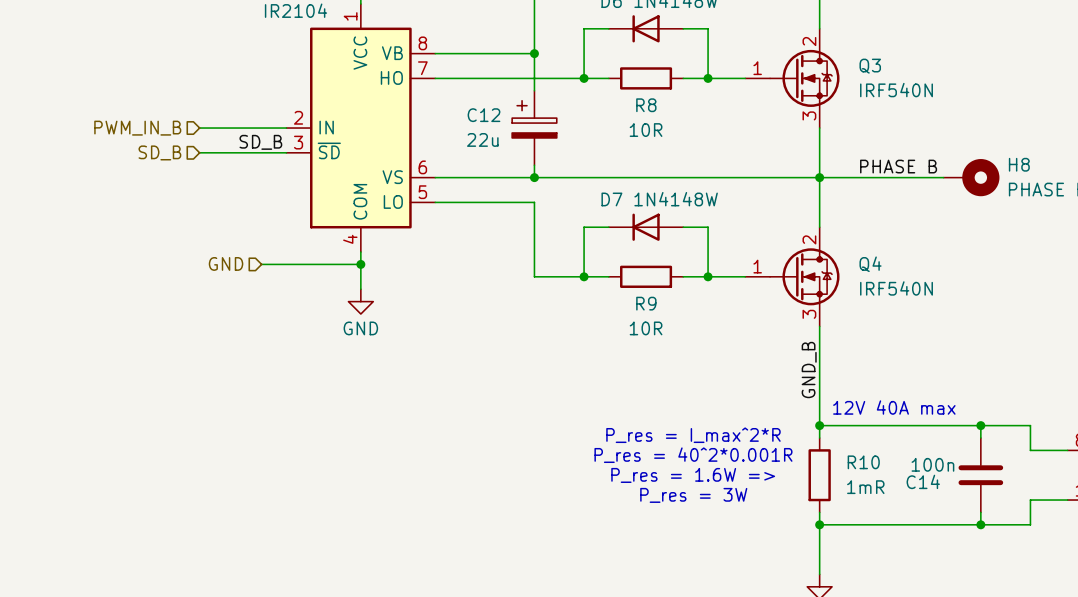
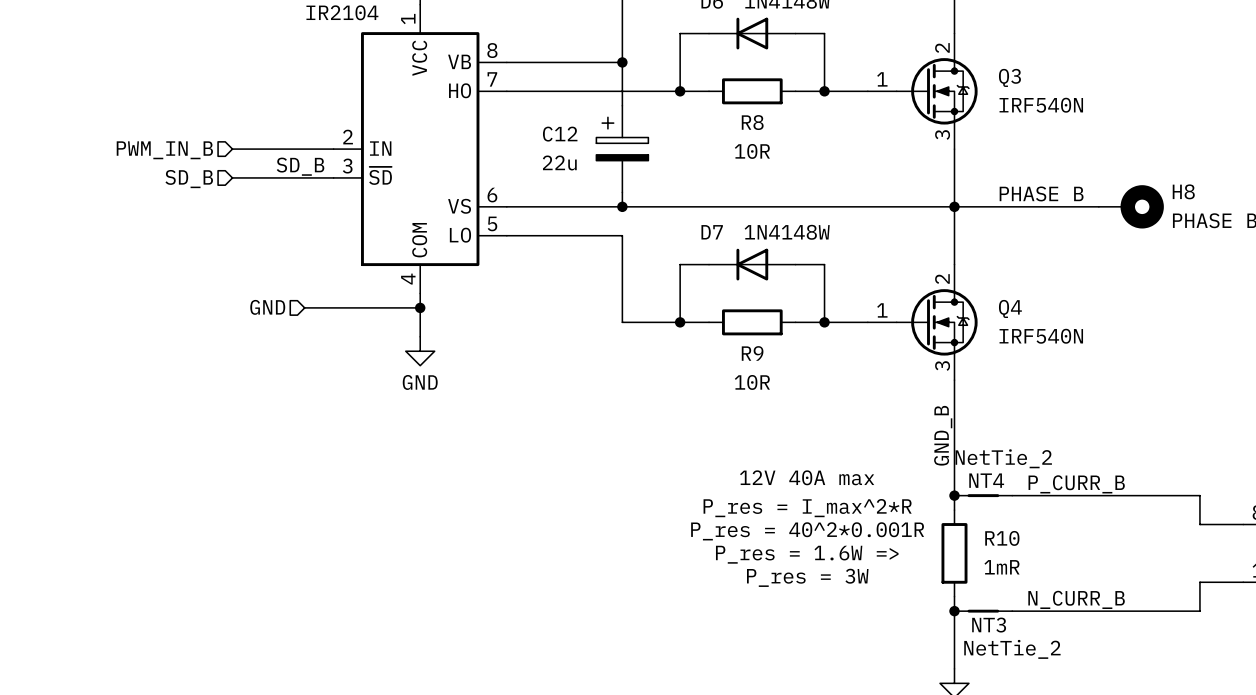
text position: 12V 40A max (894, 407) -> 12V 40A max (807, 477)
label: none -> P_CURR_B (1076, 484)
NT4: none -> NetTie_2 (983, 495)
wire: (980, 425) (980, 438) -> none
junction: (980, 425) -> none
C14: 100n (980, 475) -> none
wire: (980, 512) (980, 524) -> none
label: none -> N_CURR_B (1076, 599)
NT3: none -> NetTie_2 (983, 611)
junction: (980, 524) -> none

